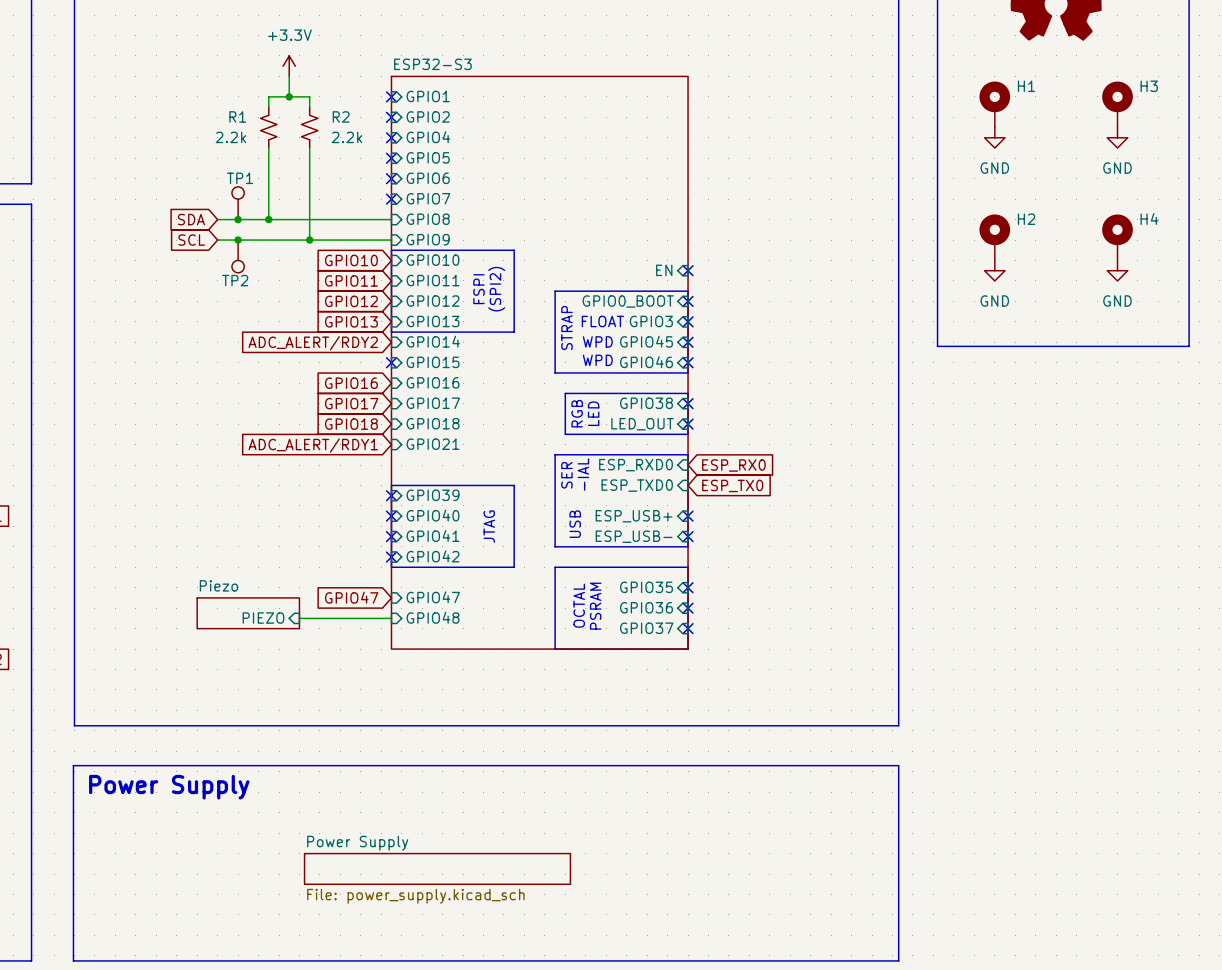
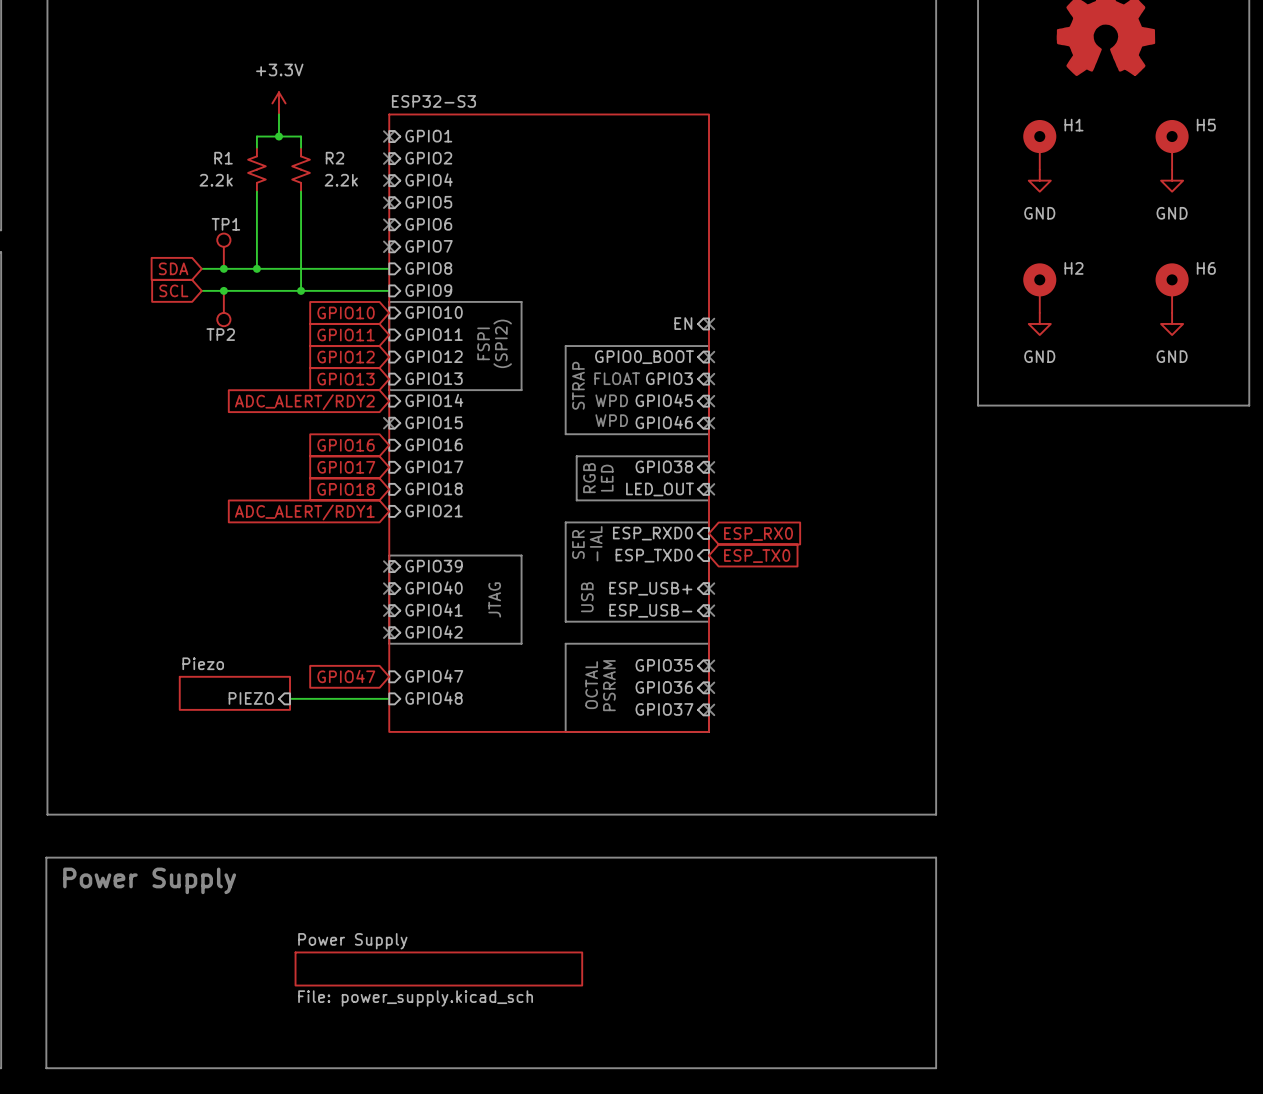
H3 name: H3 (1149, 86) -> H5 (1206, 125)
H4 name: H4 (1149, 218) -> H6 (1206, 268)

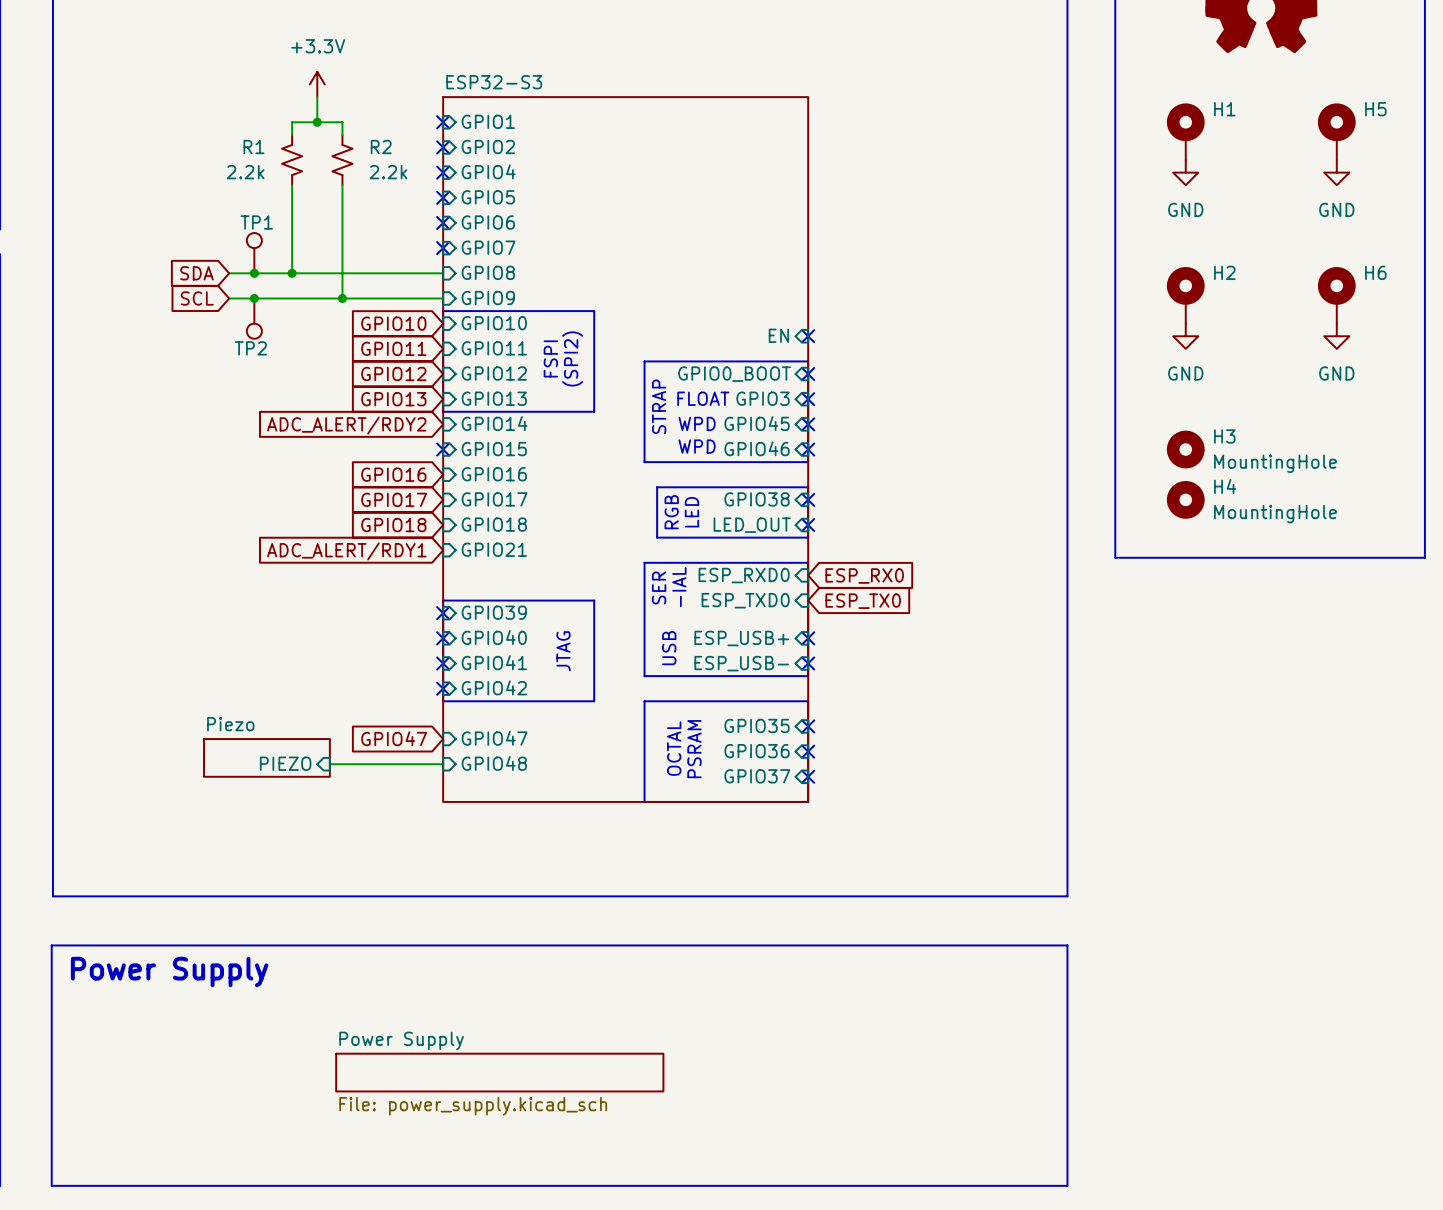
line: (978, 405) (1249, 405) -> (1115, 429) (1115, 557) (1424, 557) (1424, 429)
H3: none -> MountingHole (1185, 449)
H4: none -> MountingHole (1185, 499)

